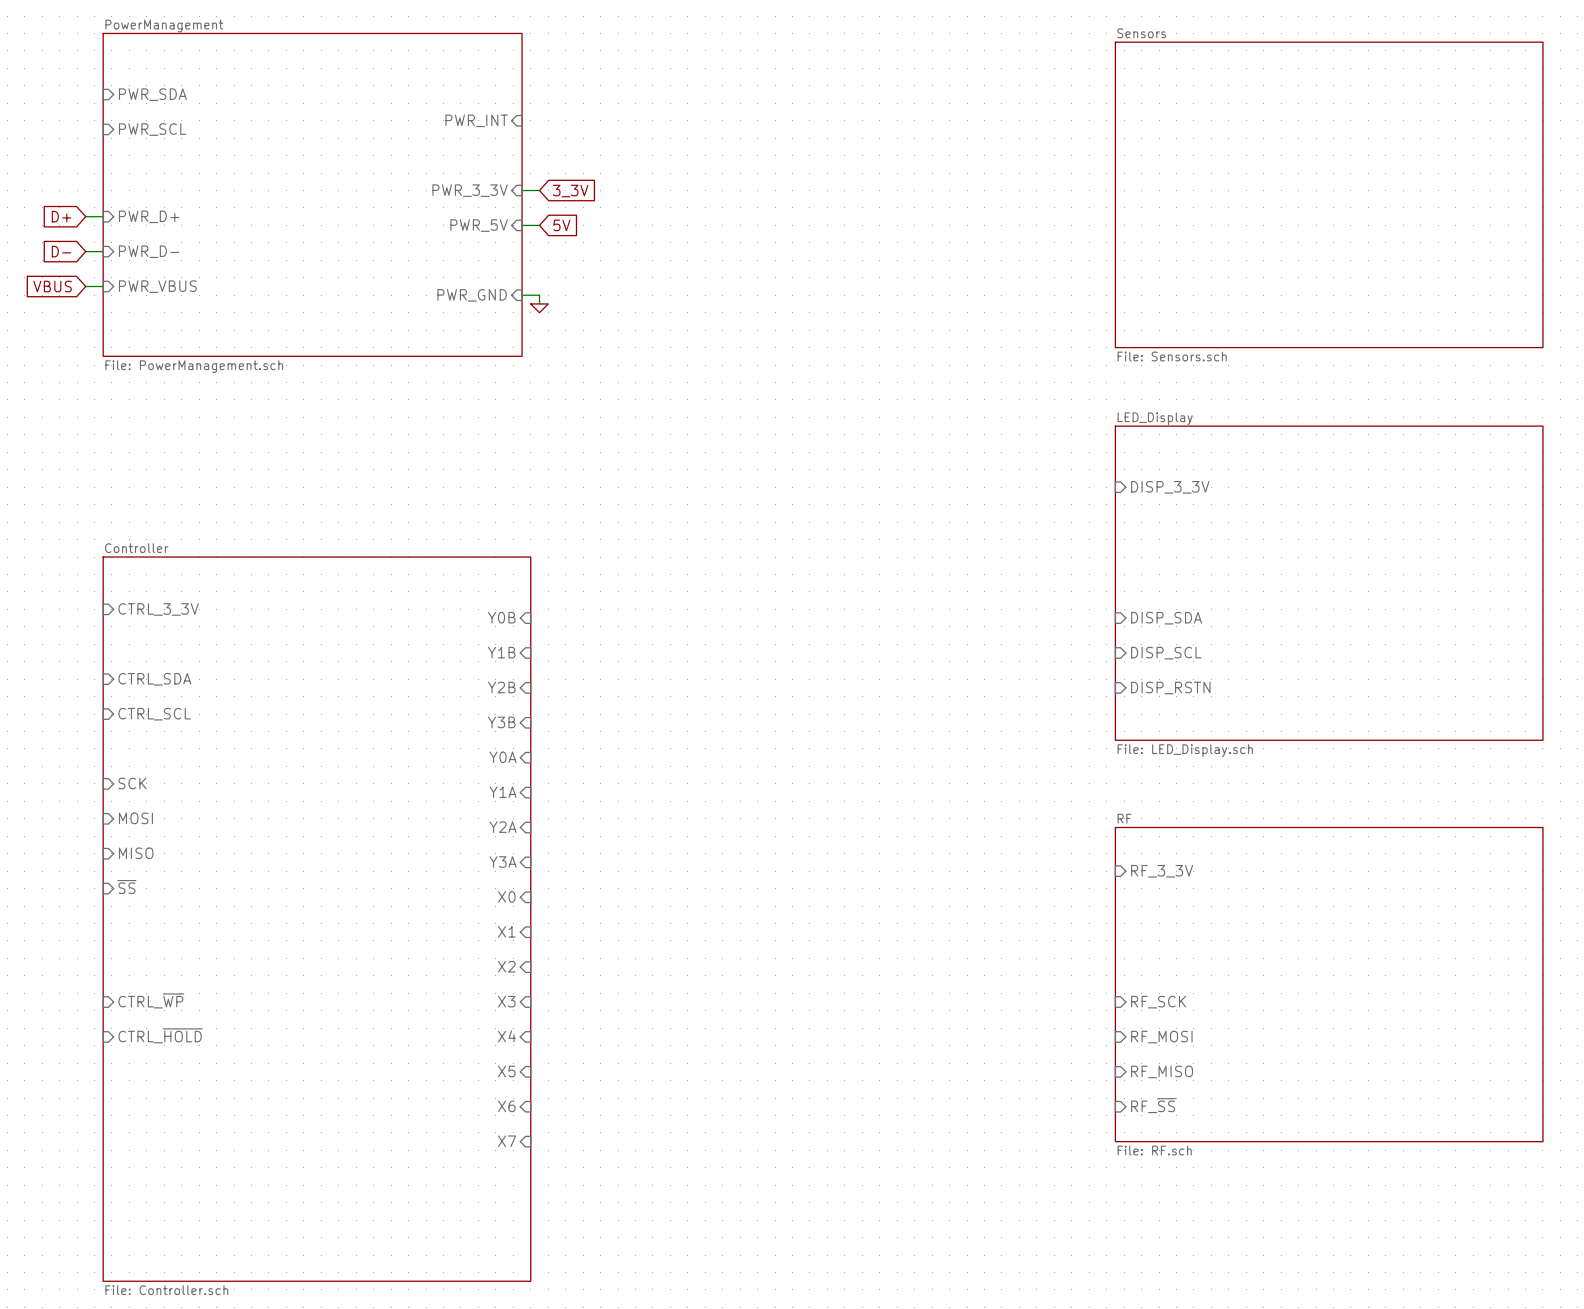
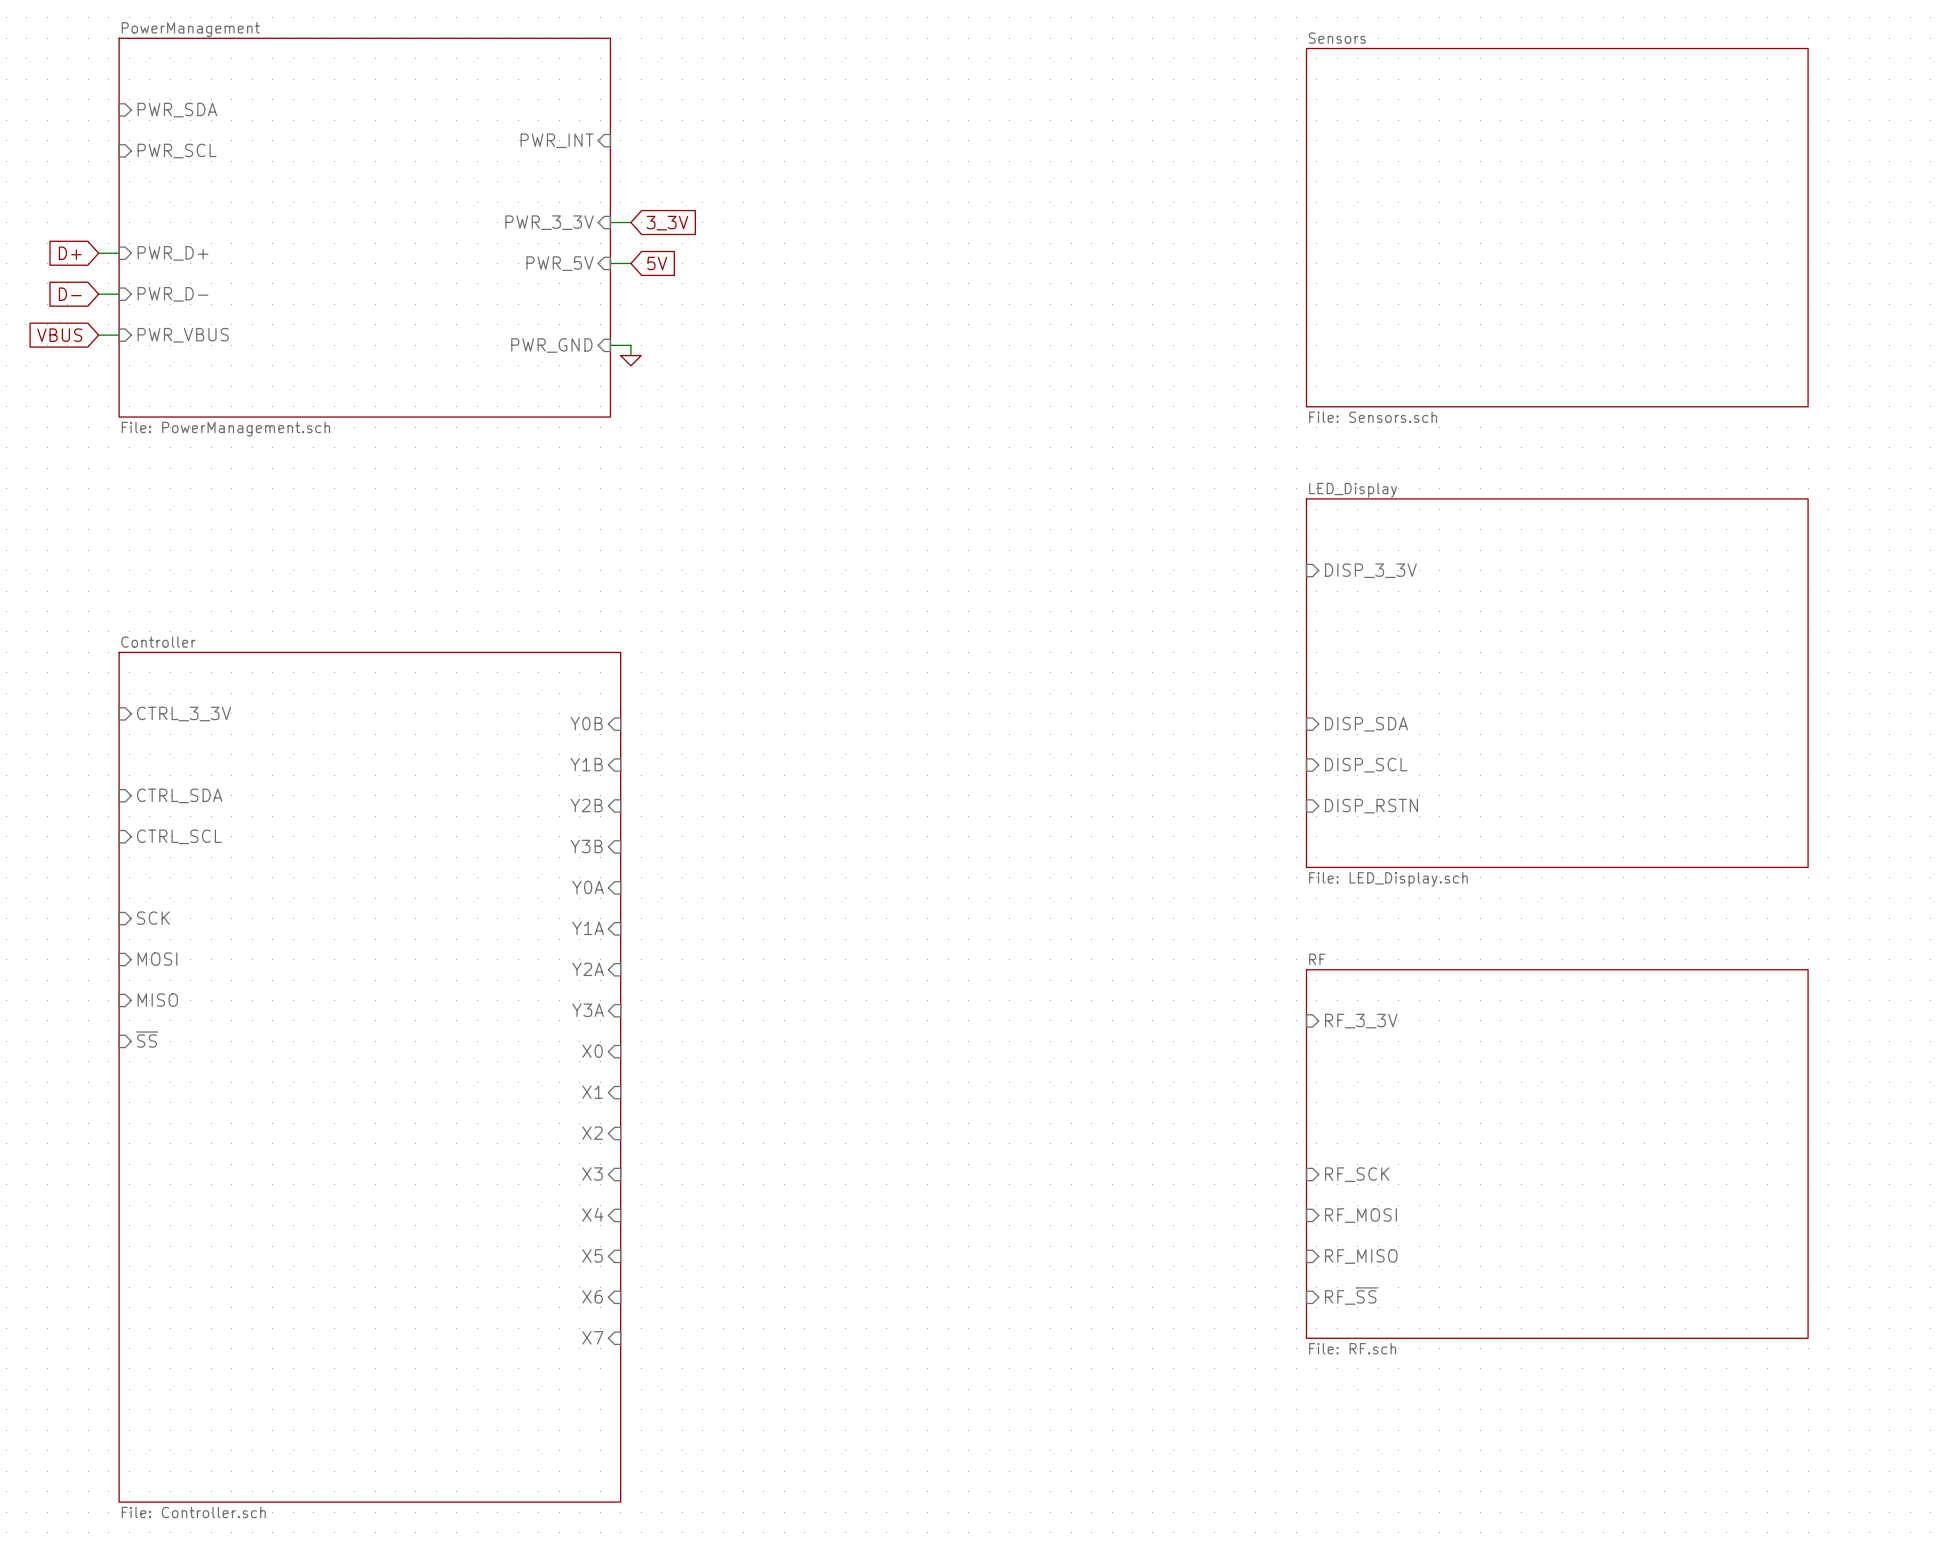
sheet pin: CTRL_~{WP} (151, 1000) -> none
sheet pin: CTRL_~{HOLD} (160, 1035) -> none

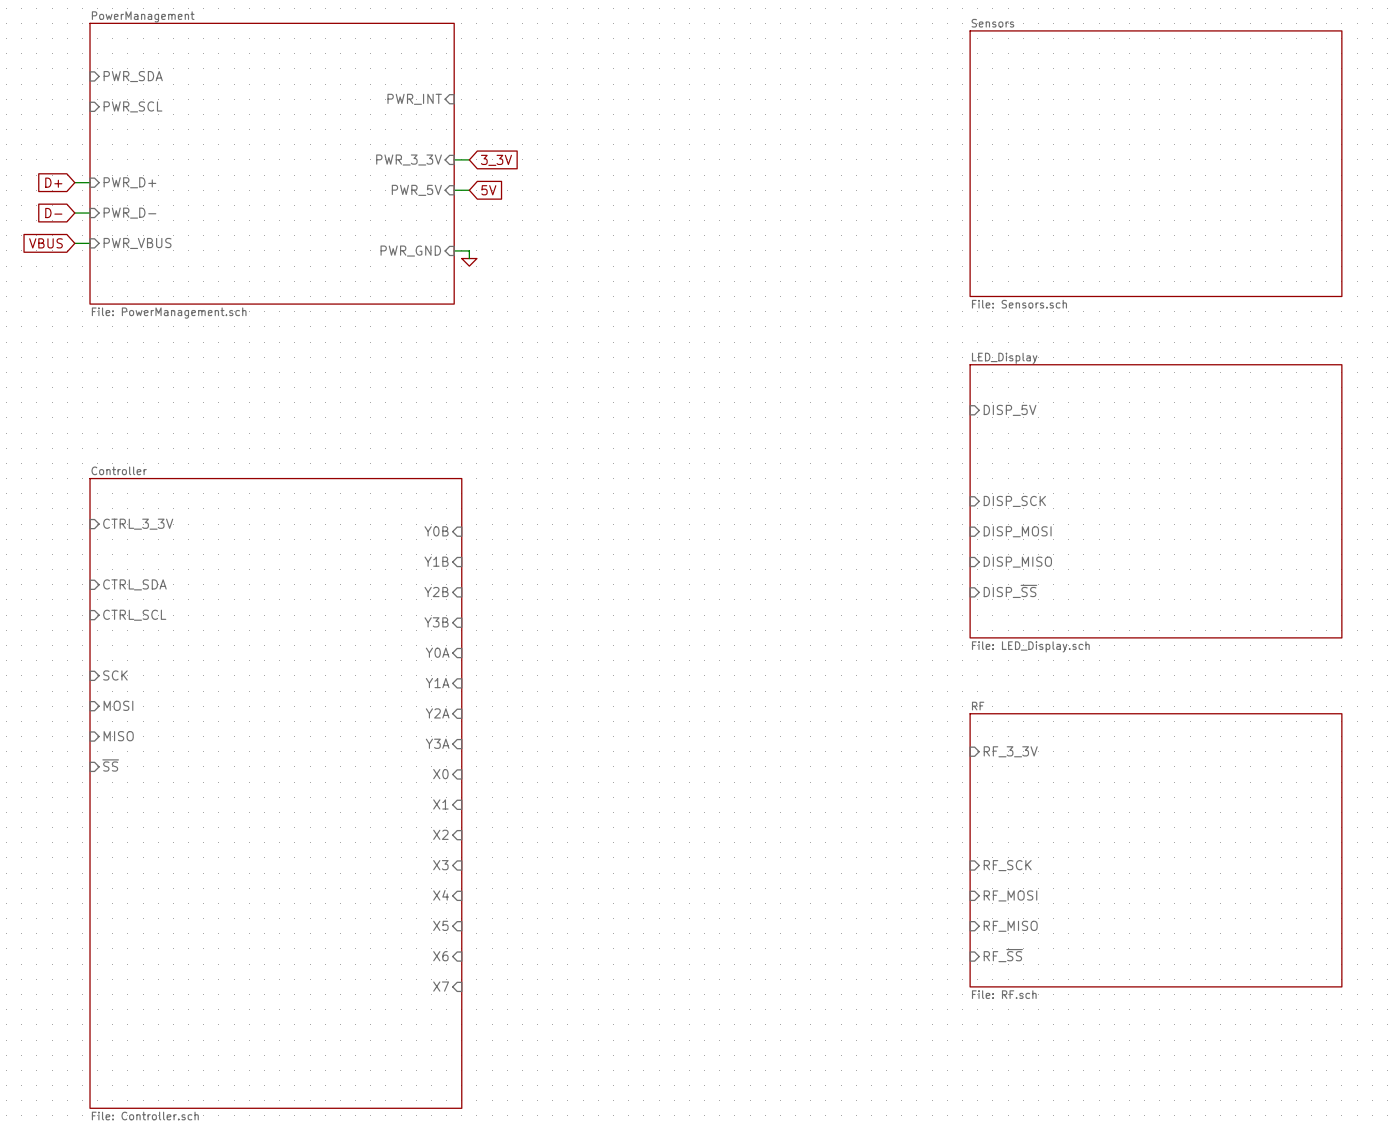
sheet pin: DISP_3_3V (1370, 570) -> DISP_5V (1010, 410)
sheet pin: none -> DISP_SCK (1014, 501)
sheet pin: DISP_SDA (1366, 724) -> DISP_MOSI (1017, 531)
sheet pin: DISP_SCL (1366, 765) -> DISP_MISO (1017, 562)
sheet pin: DISP_RSTN (1371, 806) -> DISP_~{SS} (1010, 591)

